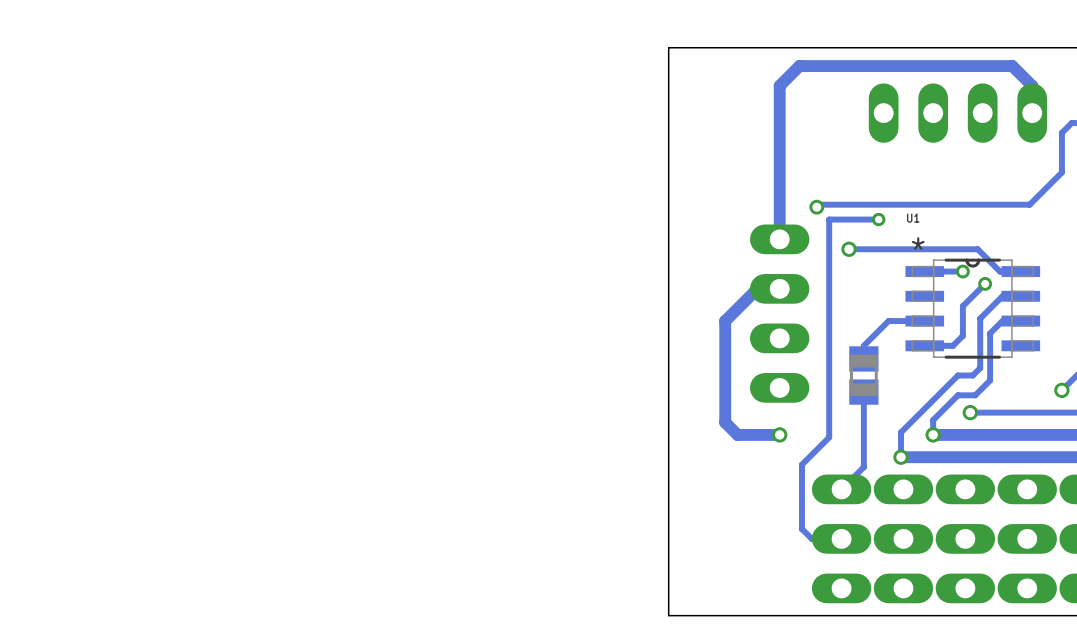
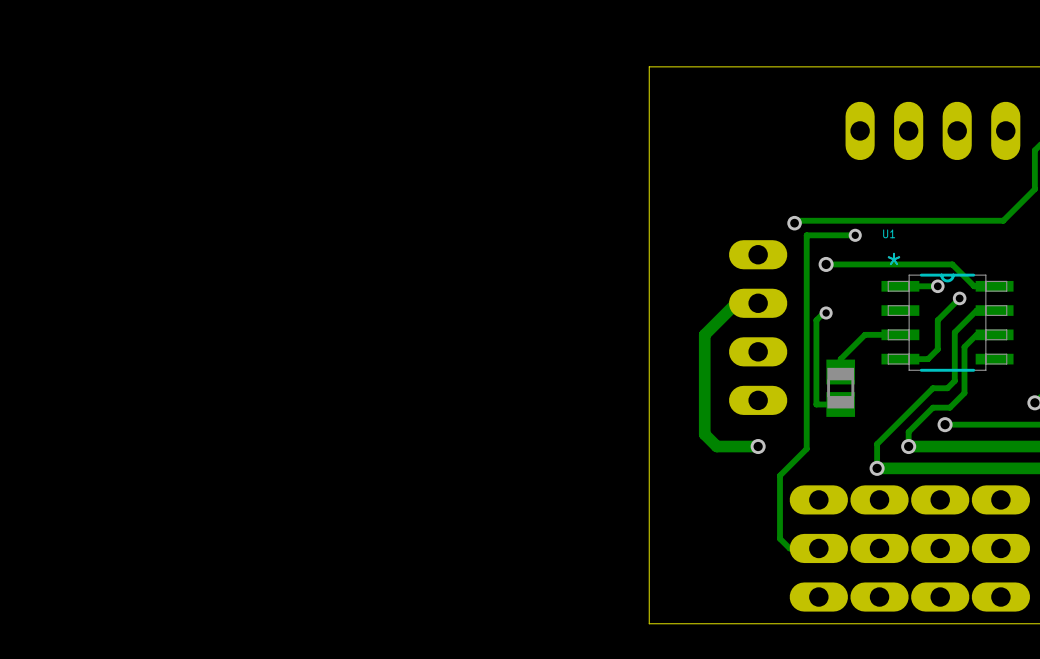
track: (1032, 113) (1032, 85) (1012, 66) (799, 66) (779, 85) (779, 239) -> none
via: none -> (826, 313)
track: (863, 392) (863, 467) (841, 489) -> (840, 404) (816, 404) (816, 320) (826, 313)

